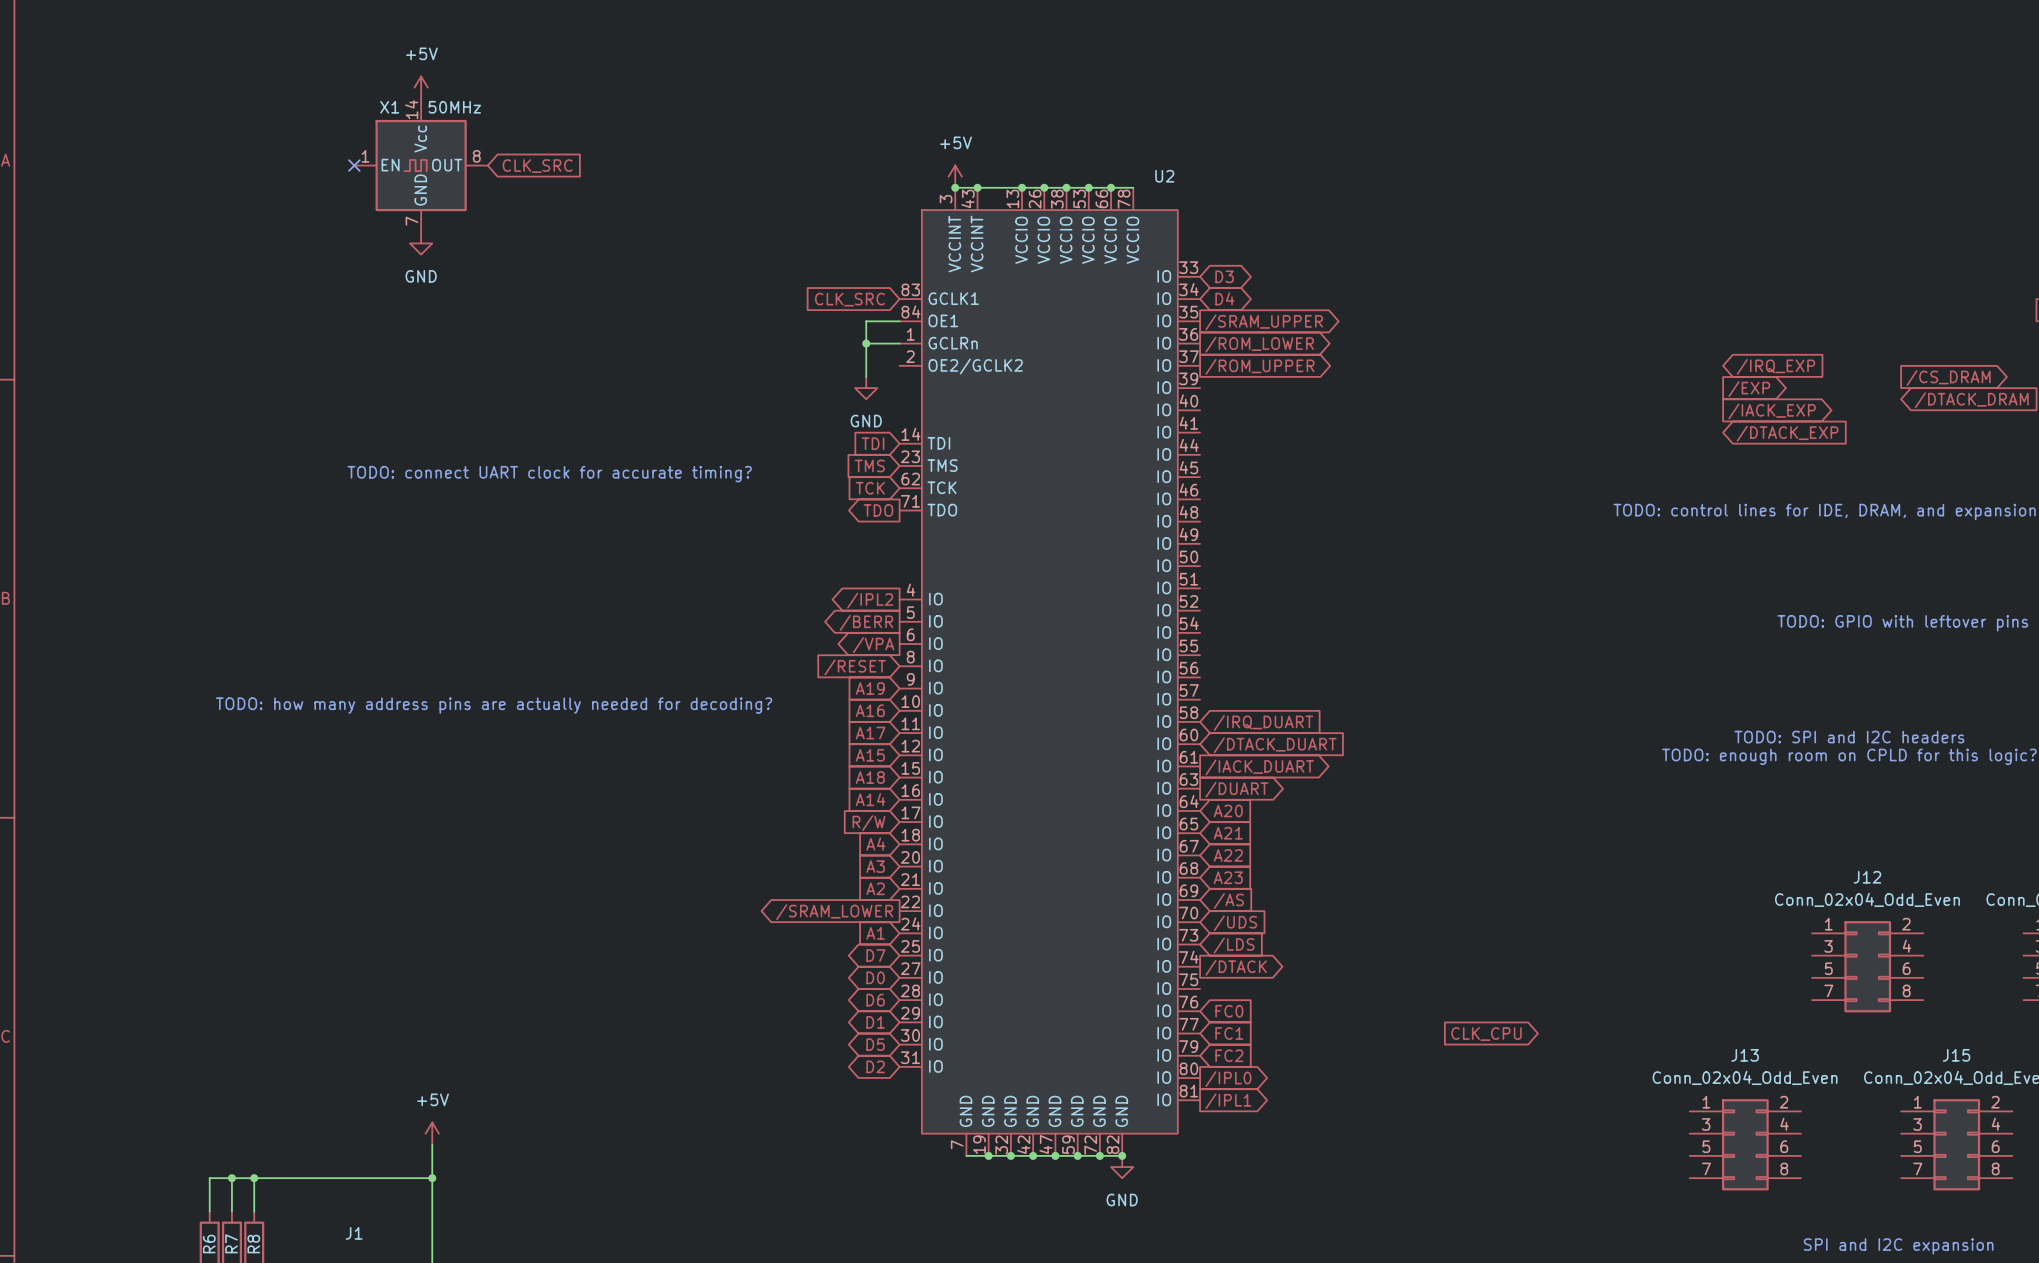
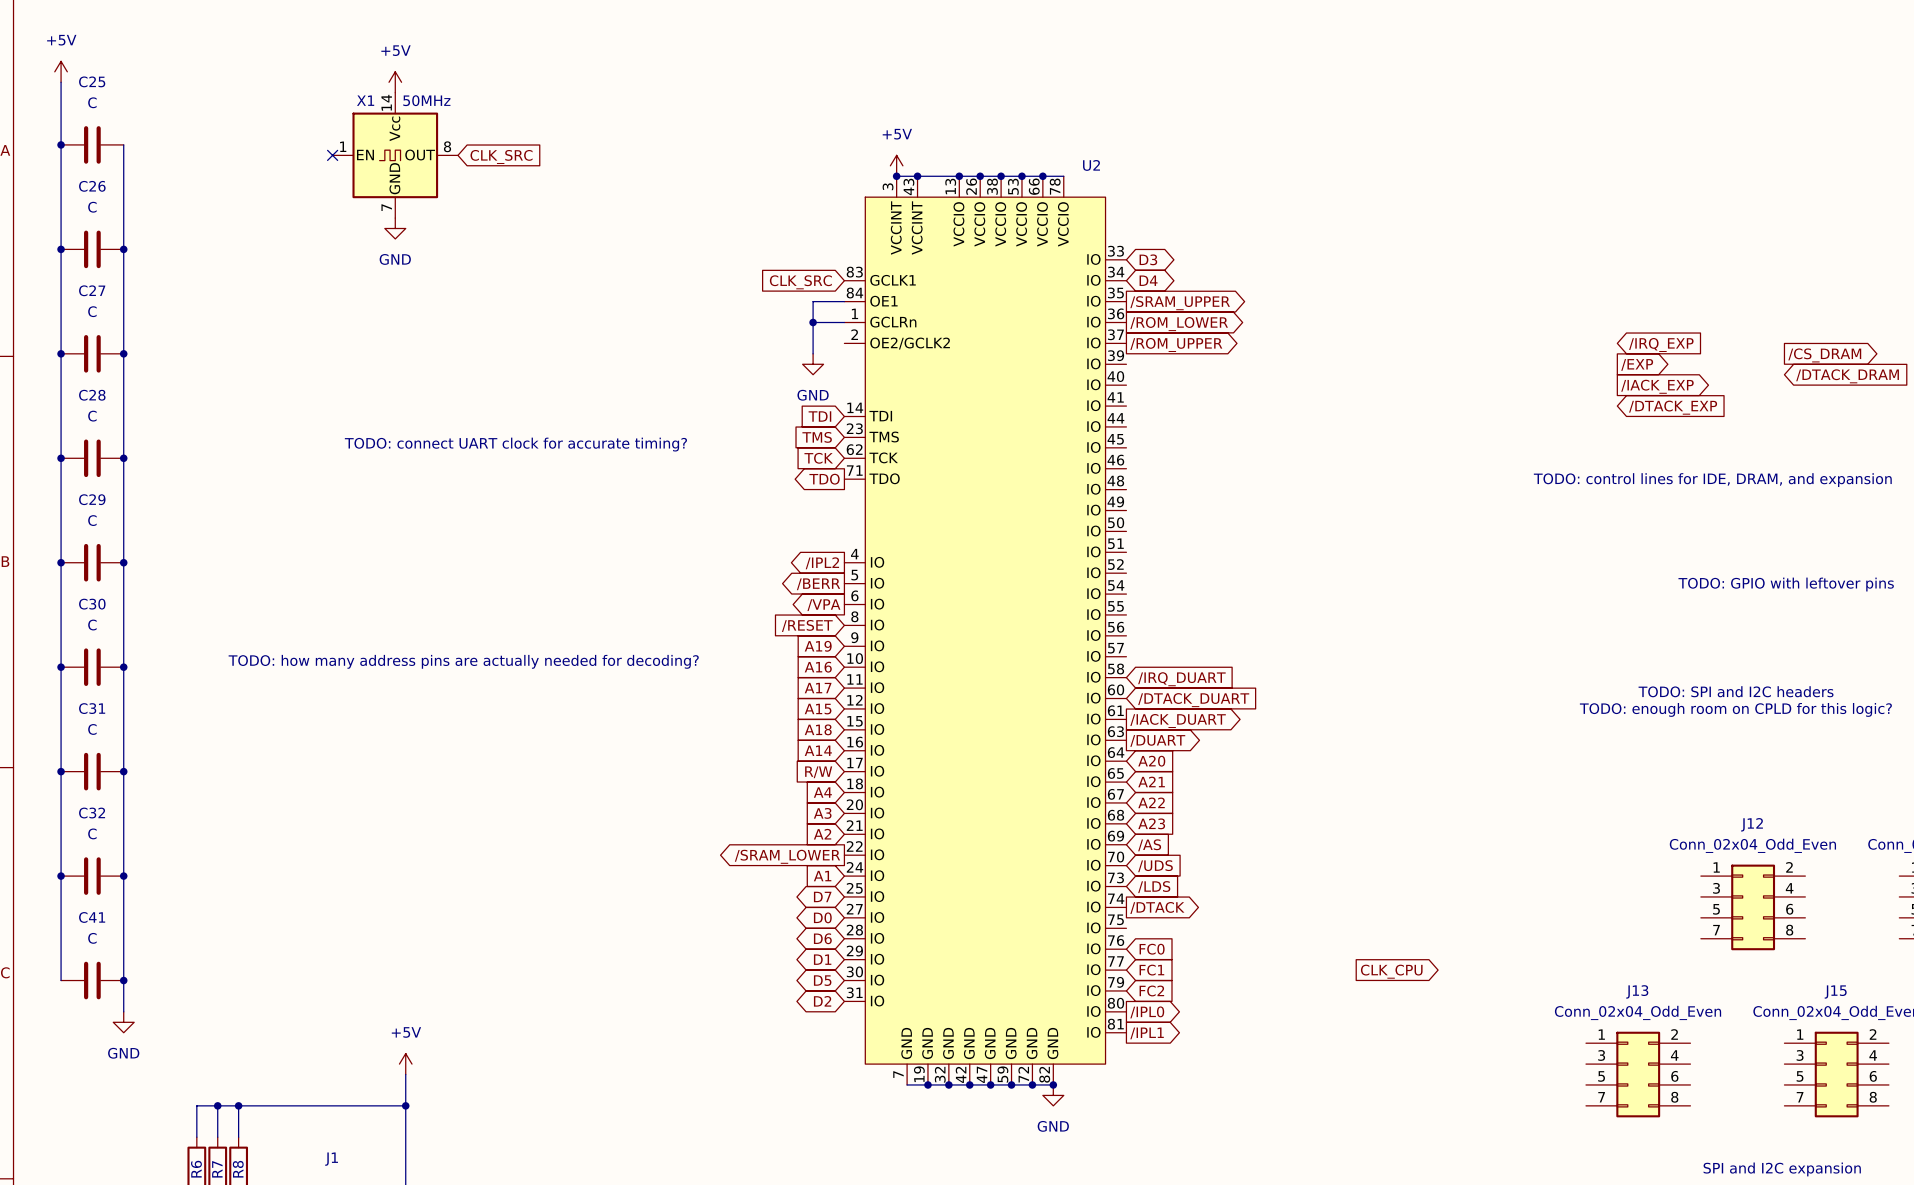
power symbol: none -> +5V (61, 71)
wire: none -> (61, 82) (61, 980)
junction: none -> (61, 144)
C25: none -> C (92, 144)
wire: none -> (123, 144) (123, 1011)
junction: none -> (61, 249)
C26: none -> C (92, 249)
junction: none -> (123, 249)
junction: none -> (61, 353)
C27: none -> C (92, 353)
junction: none -> (123, 353)
junction: none -> (61, 458)
C28: none -> C (92, 458)
junction: none -> (123, 458)
junction: none -> (61, 562)
C29: none -> C (92, 562)
junction: none -> (123, 562)
junction: none -> (61, 667)
C30: none -> C (92, 667)
junction: none -> (123, 667)
junction: none -> (61, 771)
C31: none -> C (92, 771)
junction: none -> (123, 771)
junction: none -> (61, 876)
C32: none -> C (92, 876)
junction: none -> (123, 876)
C41: none -> C (92, 980)
junction: none -> (123, 980)
power symbol: none -> GND (123, 1022)

